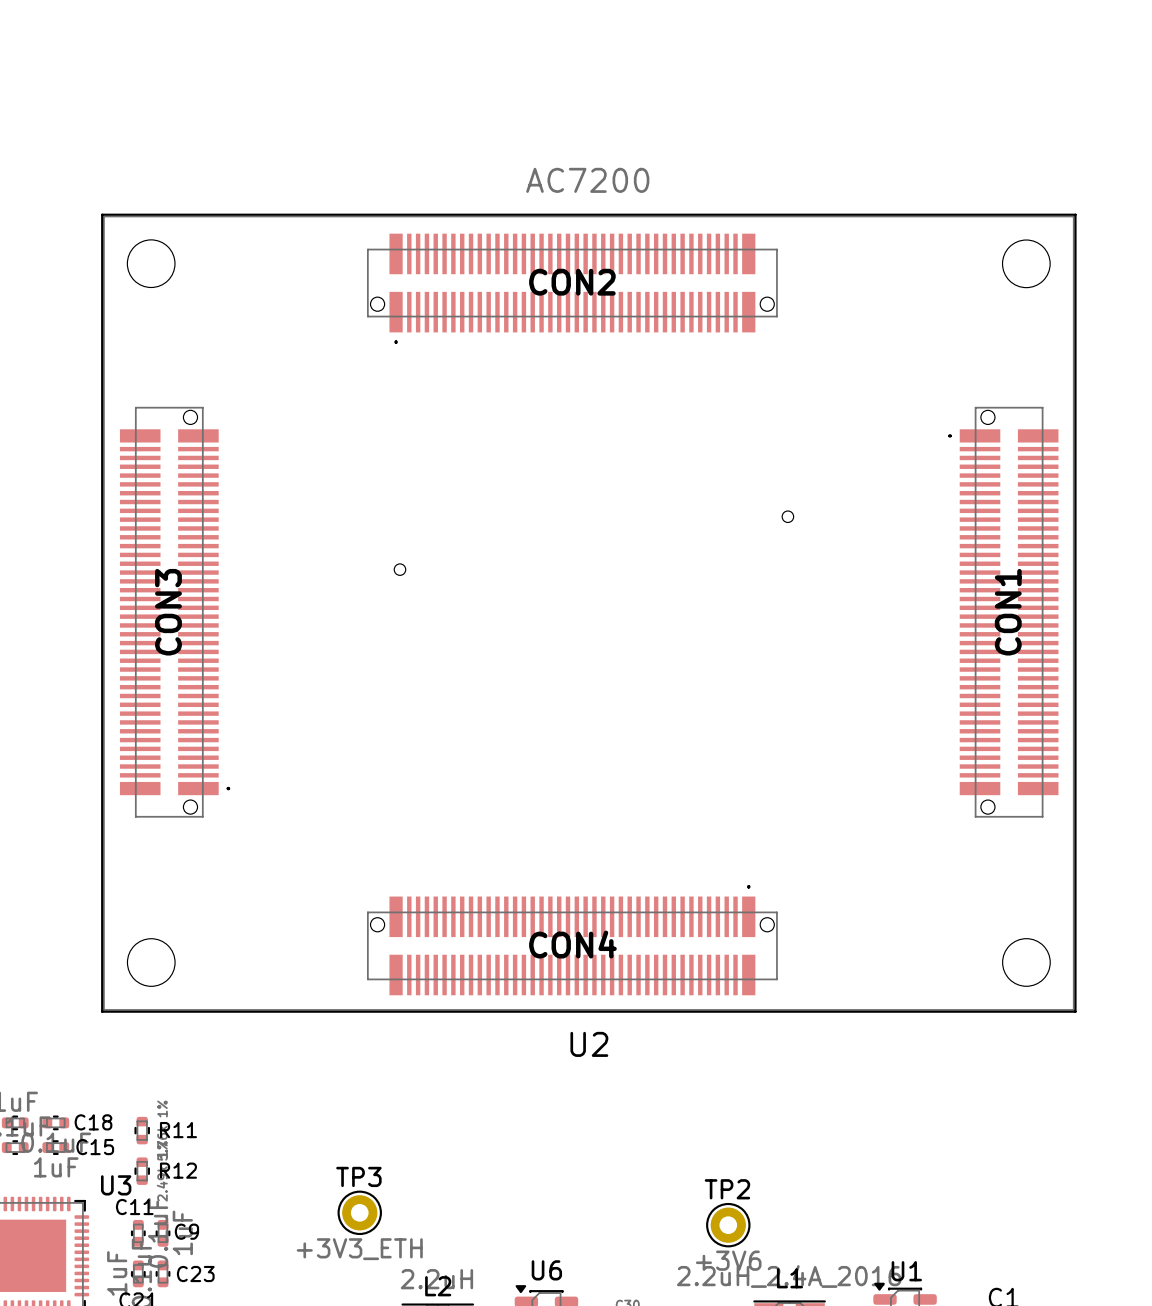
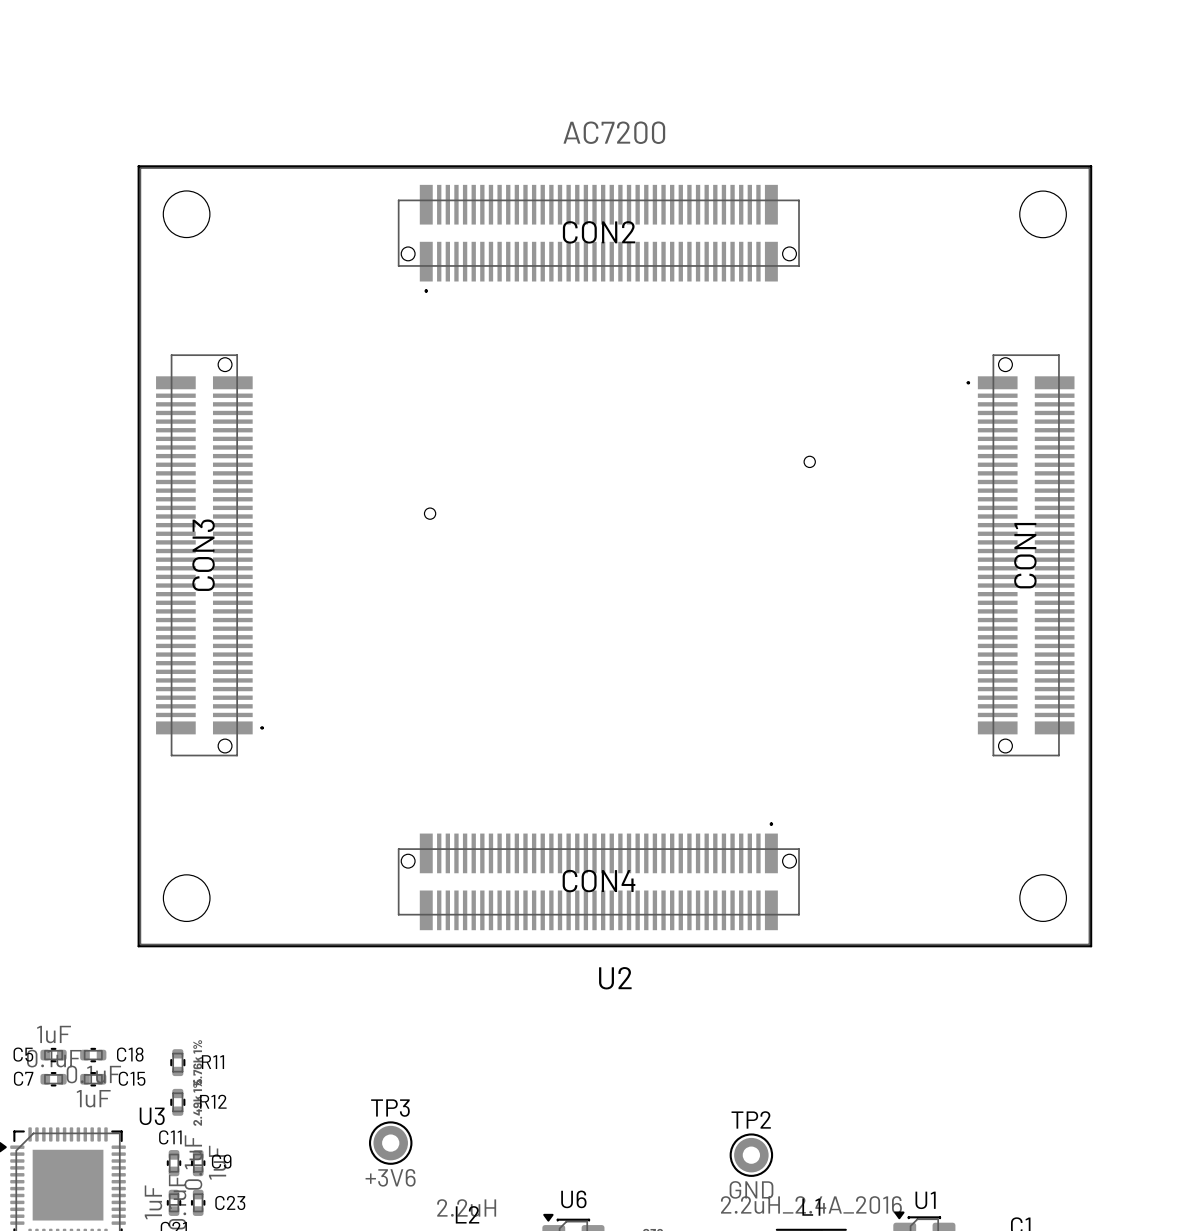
TP3 value: +3V3_ETH (359, 1249) -> +3V6 (390, 1177)
TP2 value: +3V6 (728, 1260) -> GND (751, 1189)

